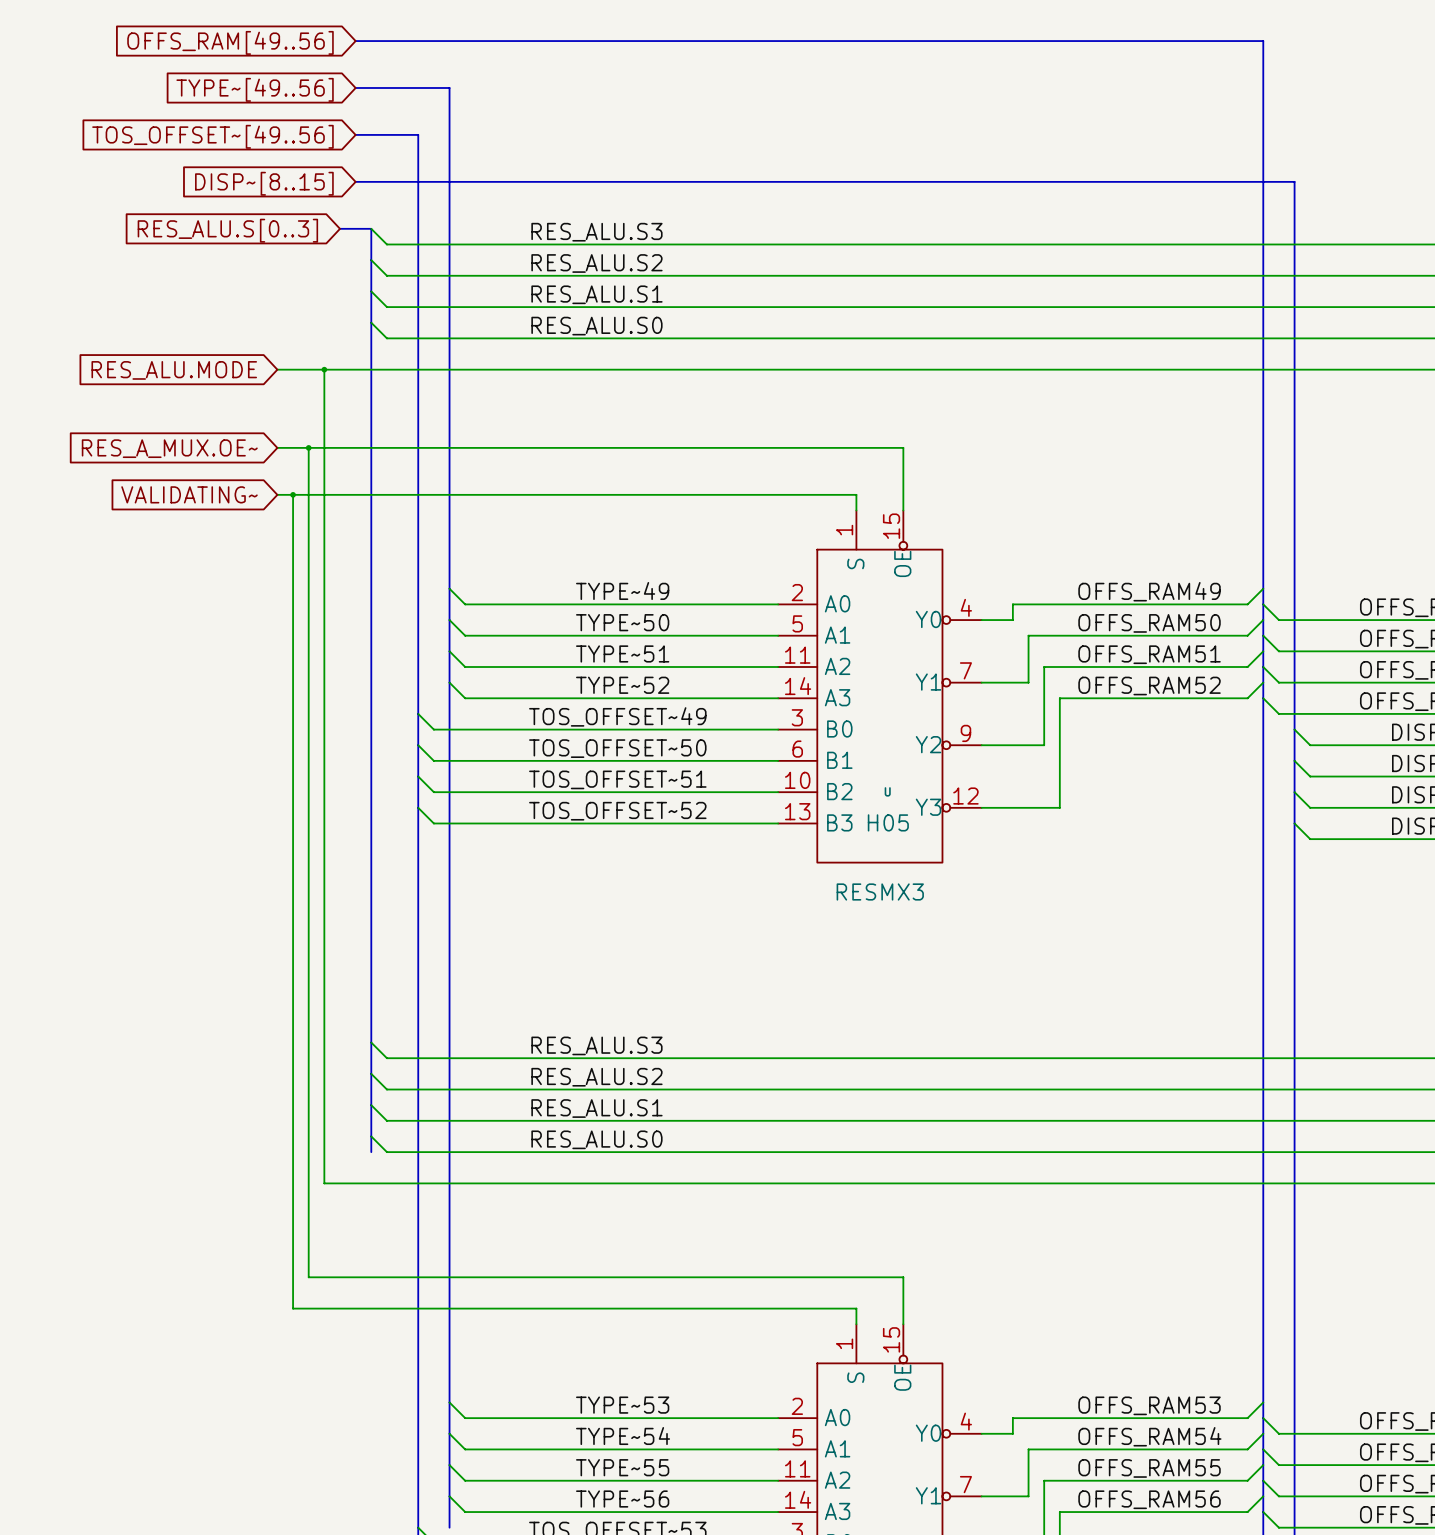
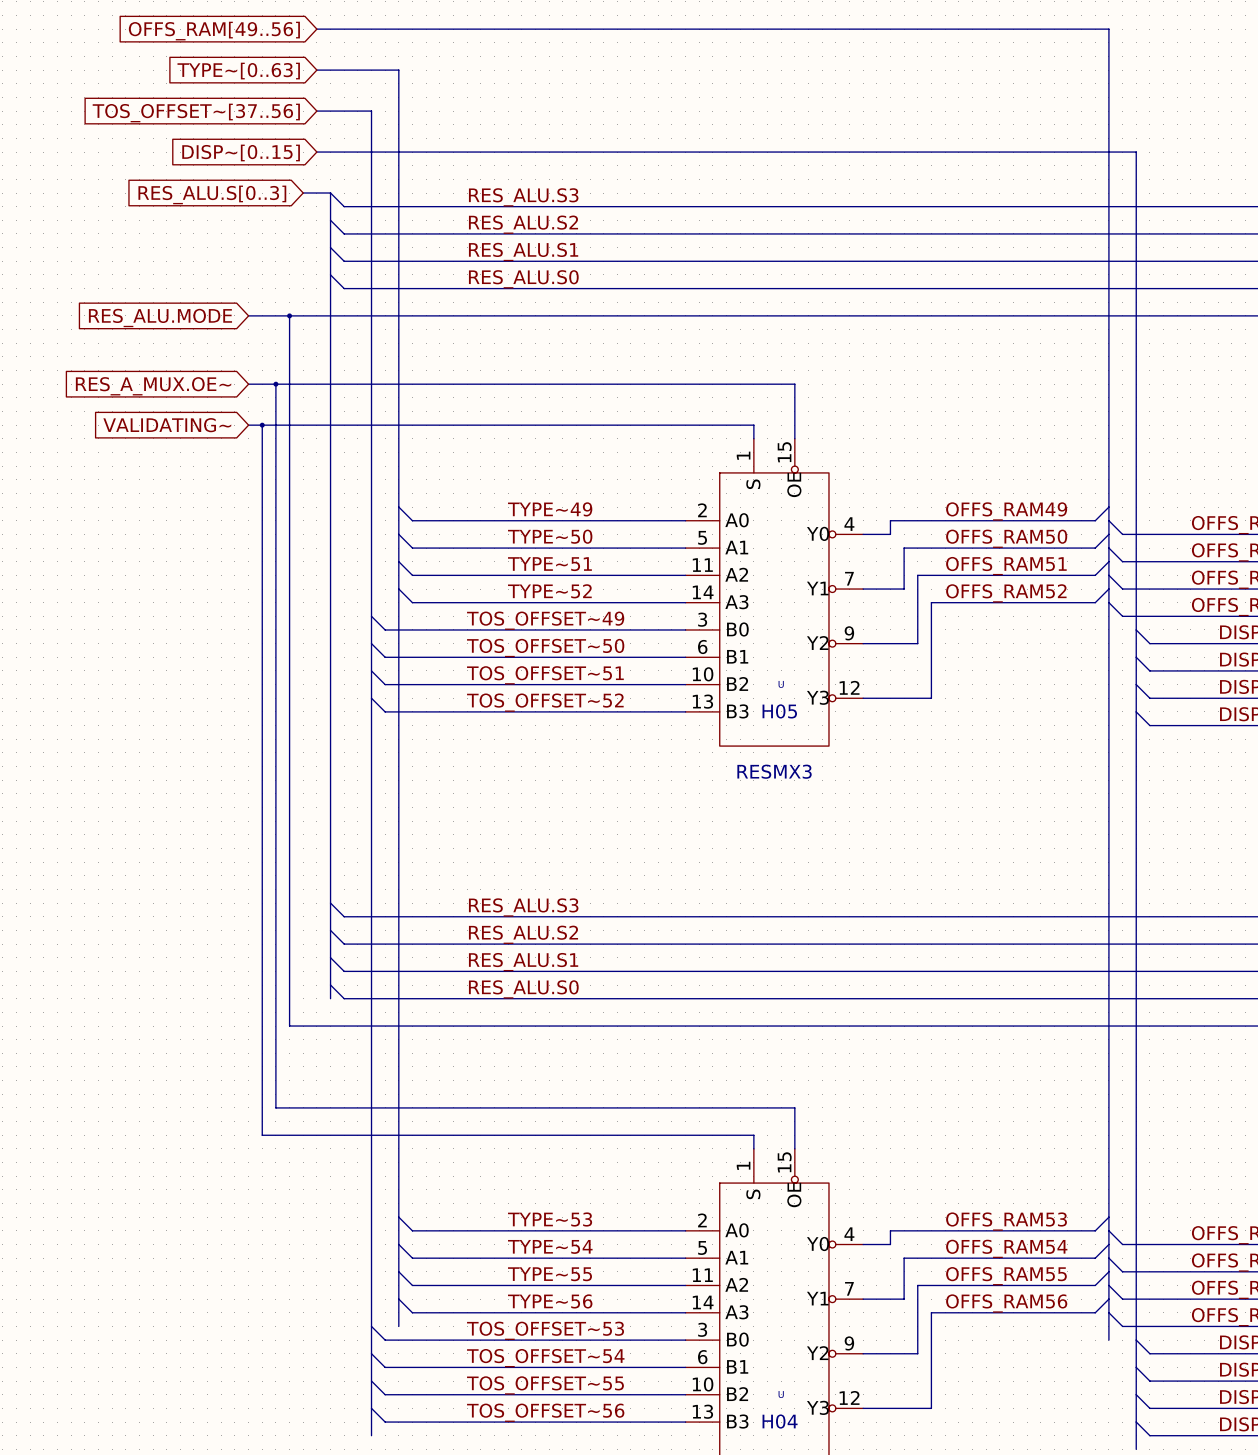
global label: TYPE~[49..56] (255, 89) -> TYPE~[0..63] (238, 71)
global label: TOS_OFFSET~[49..56] (212, 136) -> TOS_OFFSET~[37..56] (196, 112)
global label: DISP~[8..15] (264, 183) -> DISP~[0..15] (241, 152)

